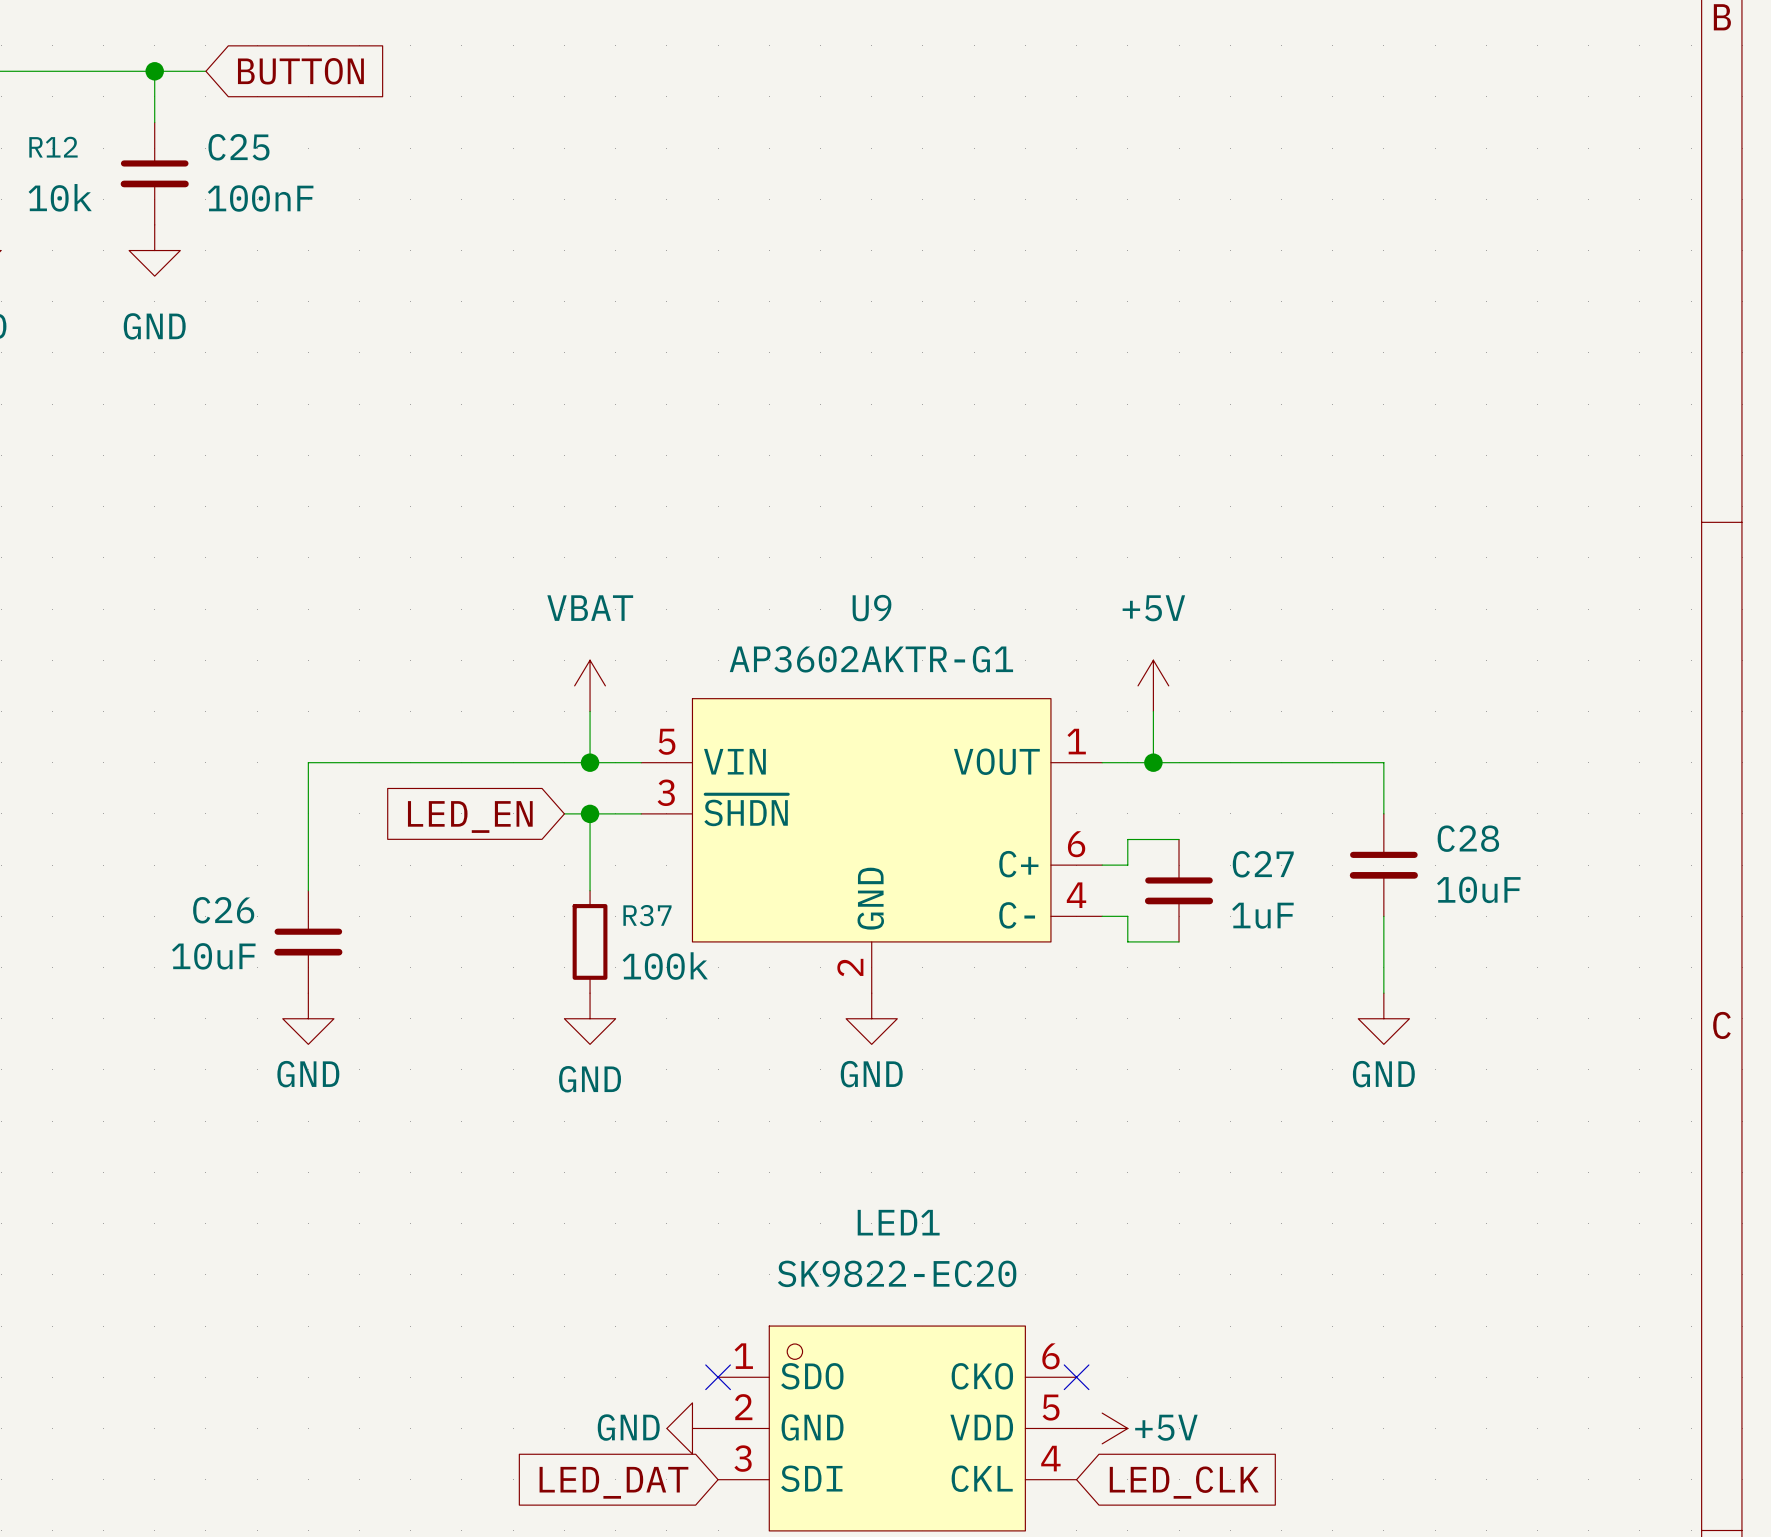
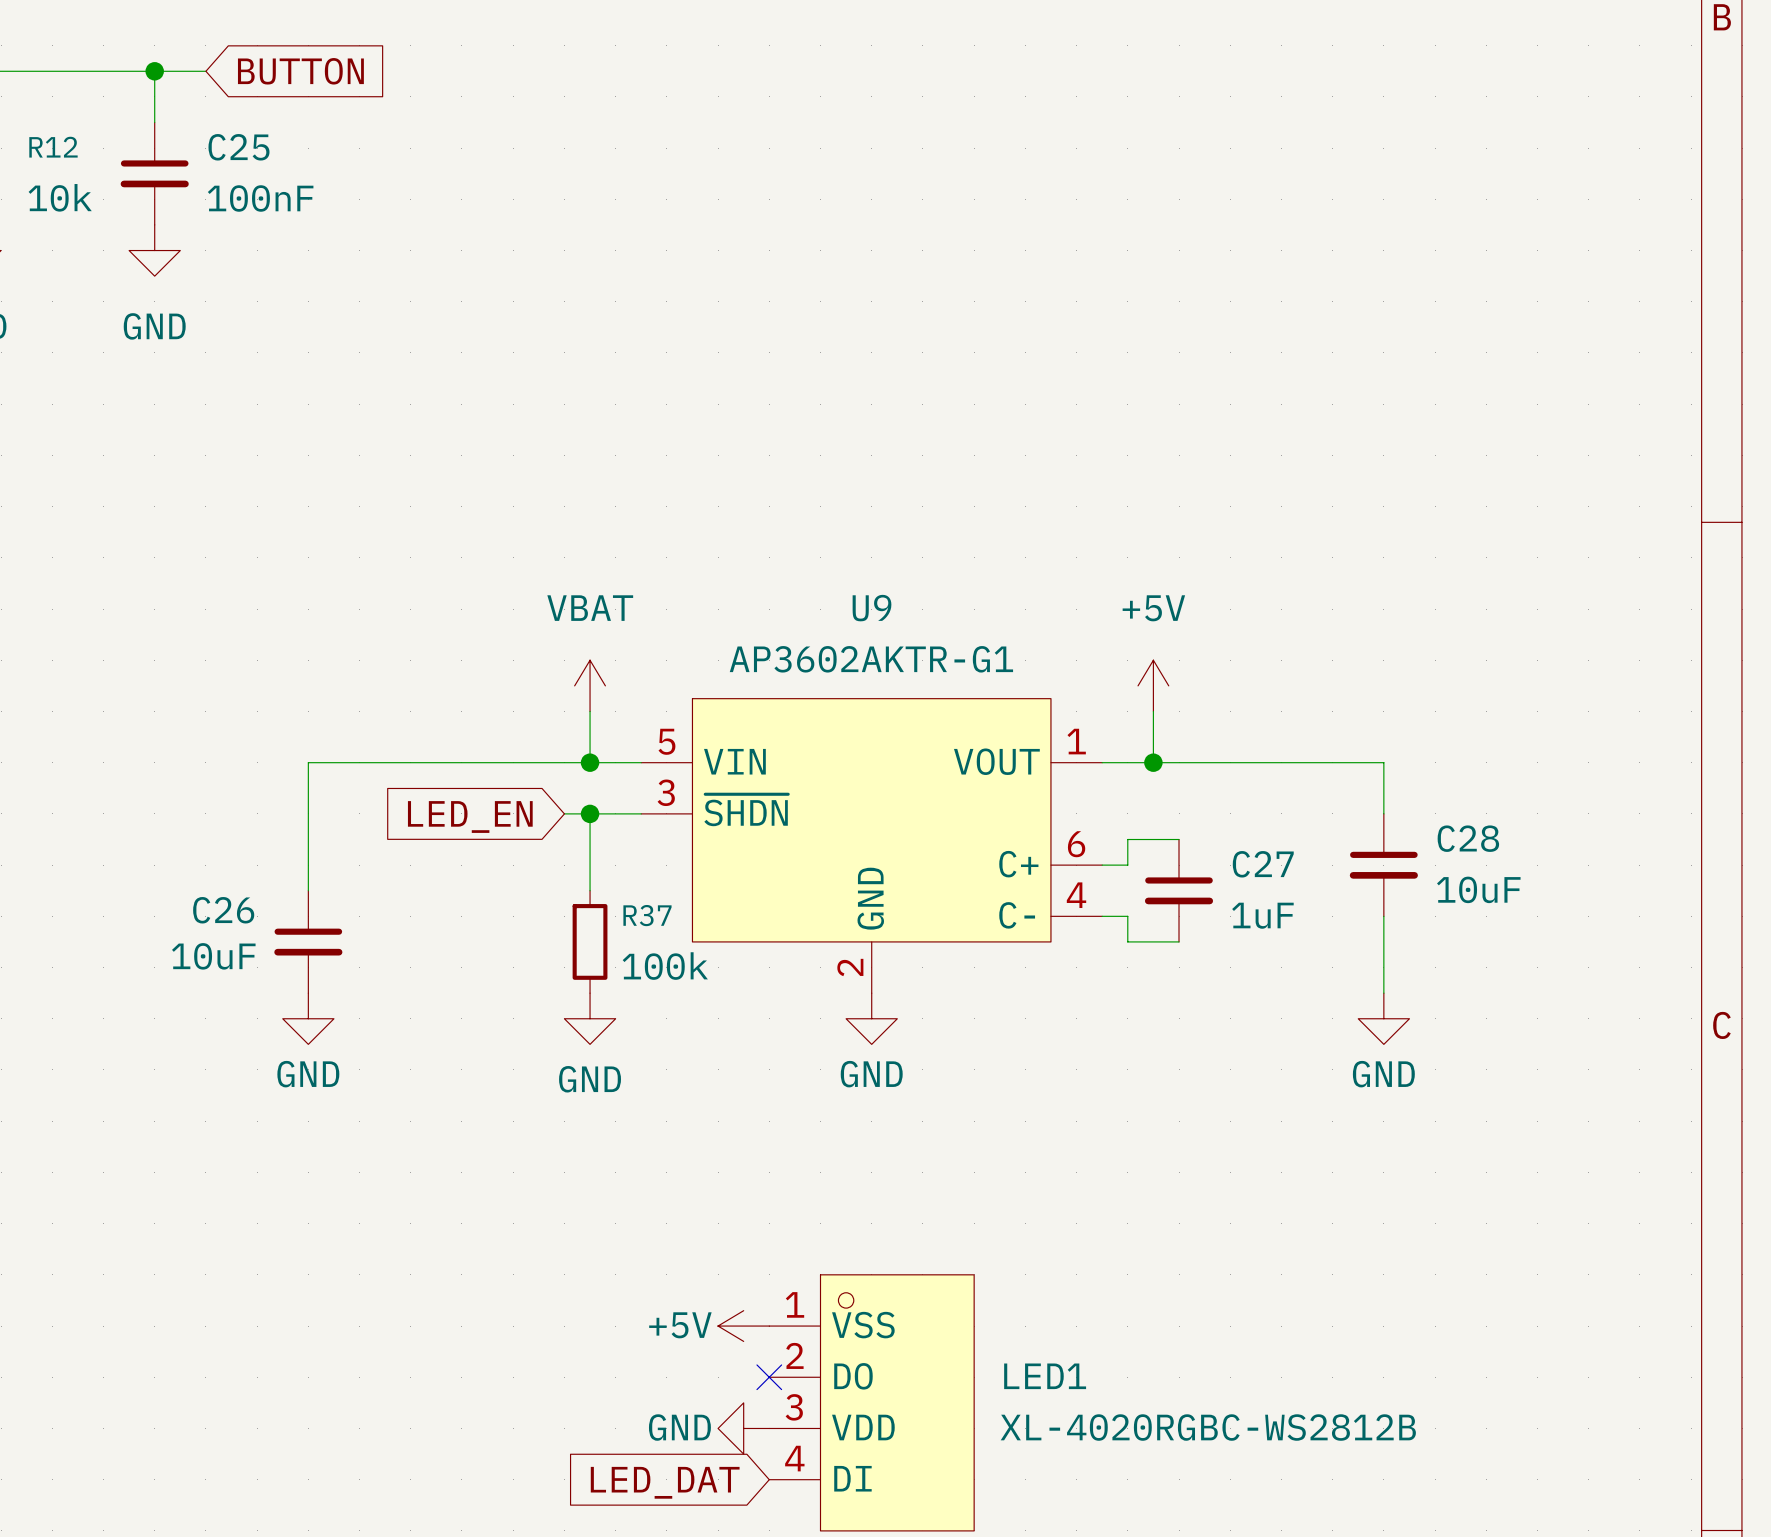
LED1 name position: LED1 (898, 1222) -> LED1 (1045, 1376)
LED1 value: SK9822-EC20 (897, 1273) -> XL-4020RGBC-WS2812B (1208, 1427)
LED1 symbol: [718, 1326, 1077, 1531] -> [769, 1274, 975, 1531]
no-connect mark position: (718, 1377) -> (769, 1377)
no-connect mark: (1076, 1377) -> none
power symbol position: GND (692, 1428) -> GND (743, 1428)
power symbol rotation: 0° (1102, 1428) -> 180° (743, 1326)
power symbol position: +5V (1102, 1428) -> +5V (743, 1326)
global label position: LED_DAT (613, 1482) -> LED_DAT (665, 1482)
global label: LED_CLK (1184, 1482) -> none

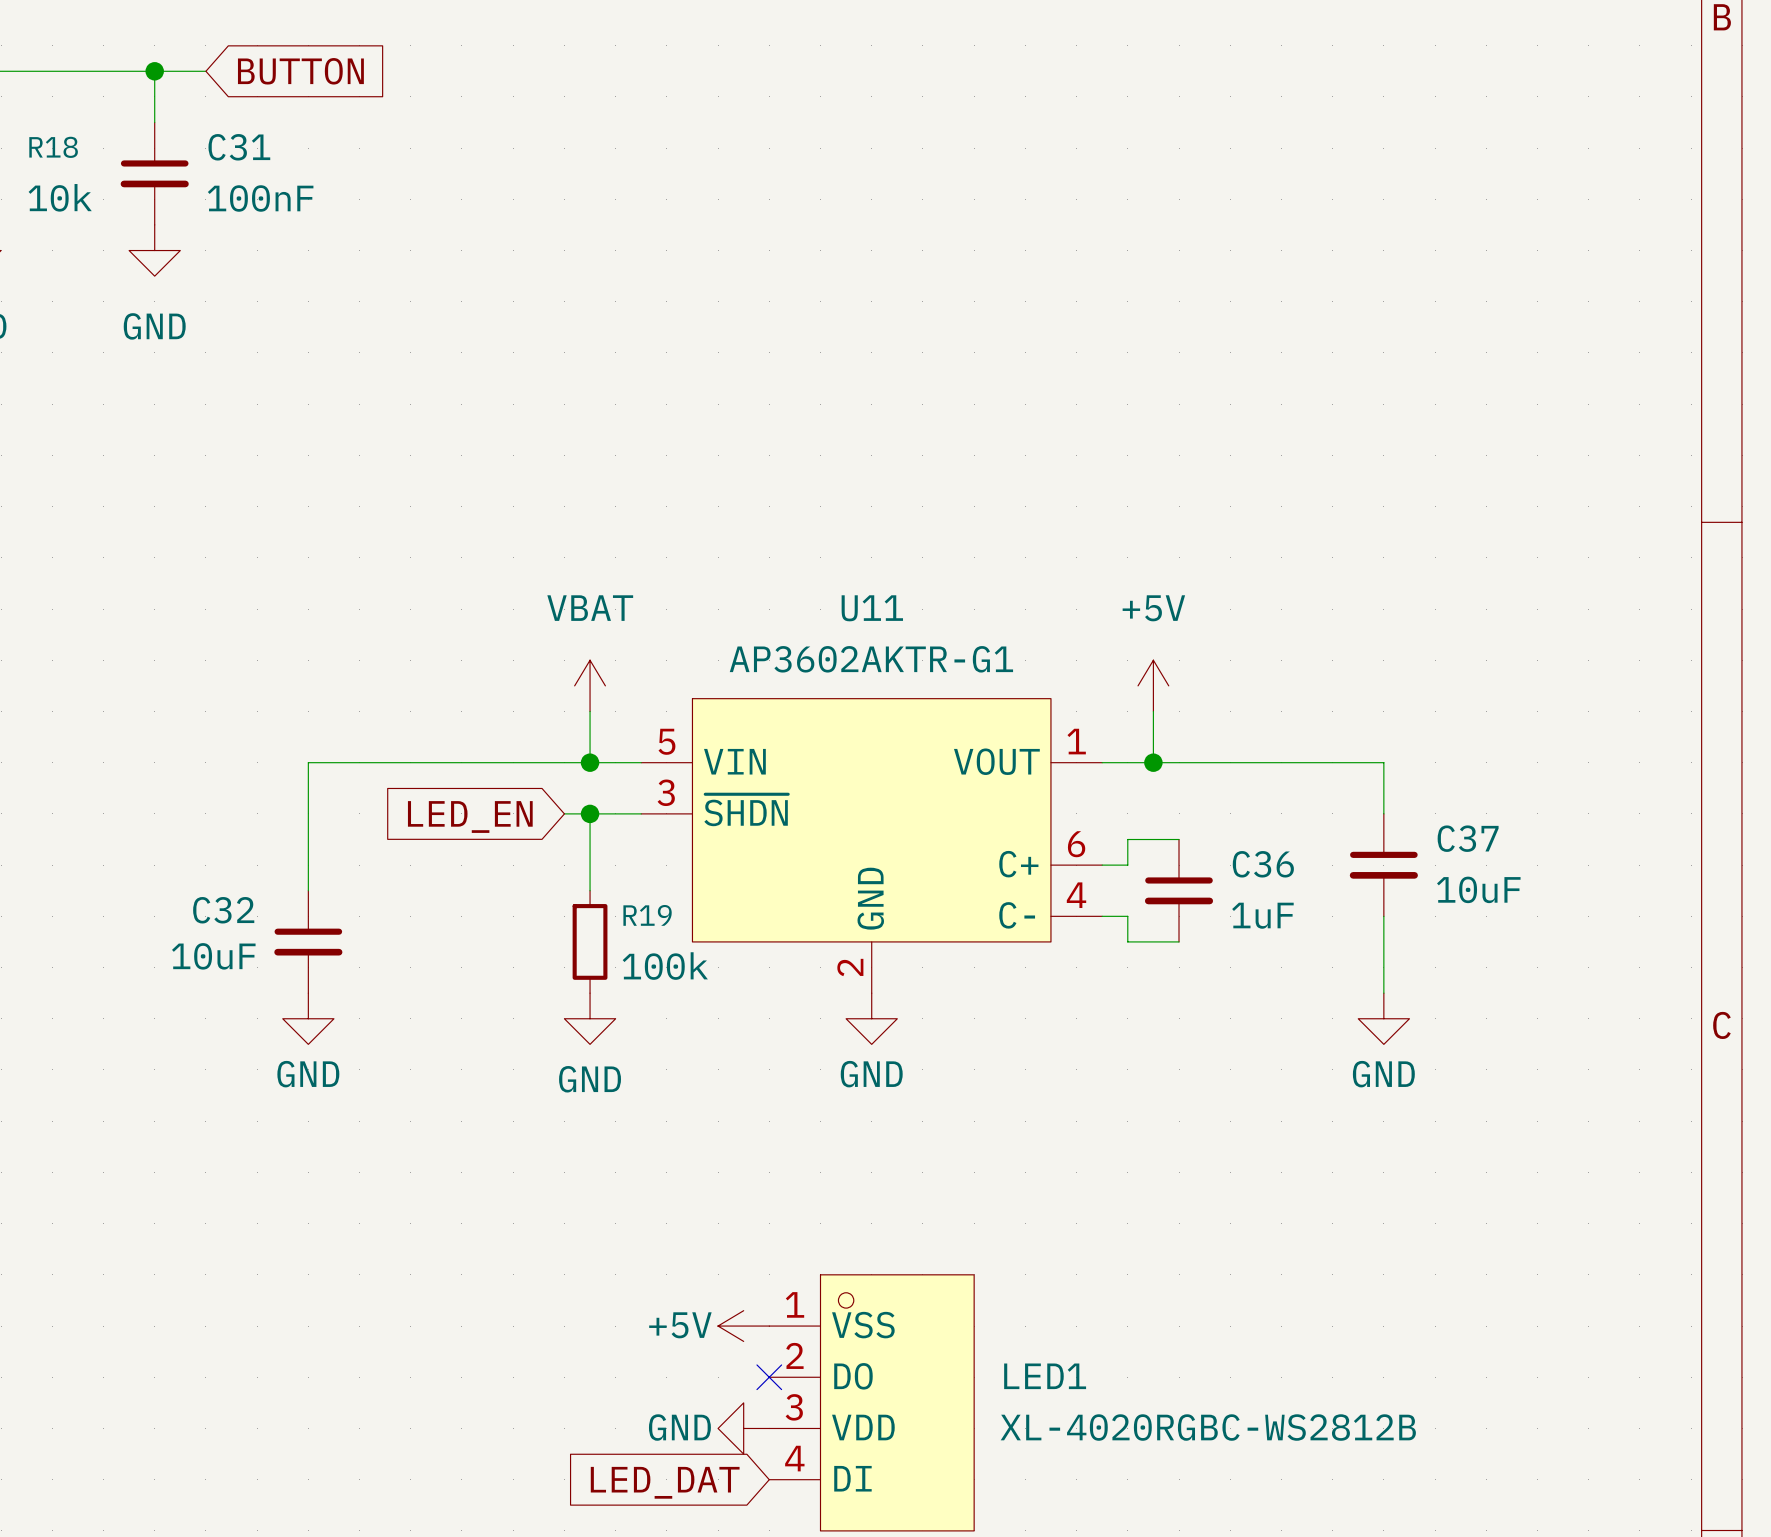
R12 name: R12 (53, 147) -> R18 (53, 147)
C25 name: C25 (238, 147) -> C31 (239, 147)
U9 name: U9 (872, 608) -> U11 (872, 608)
C28 name: C28 (1468, 838) -> C37 (1468, 838)
C27 name: C27 (1263, 864) -> C36 (1263, 864)
C26 name: C26 (223, 910) -> C32 (223, 910)
R37 name: R37 (647, 915) -> R19 (647, 915)

